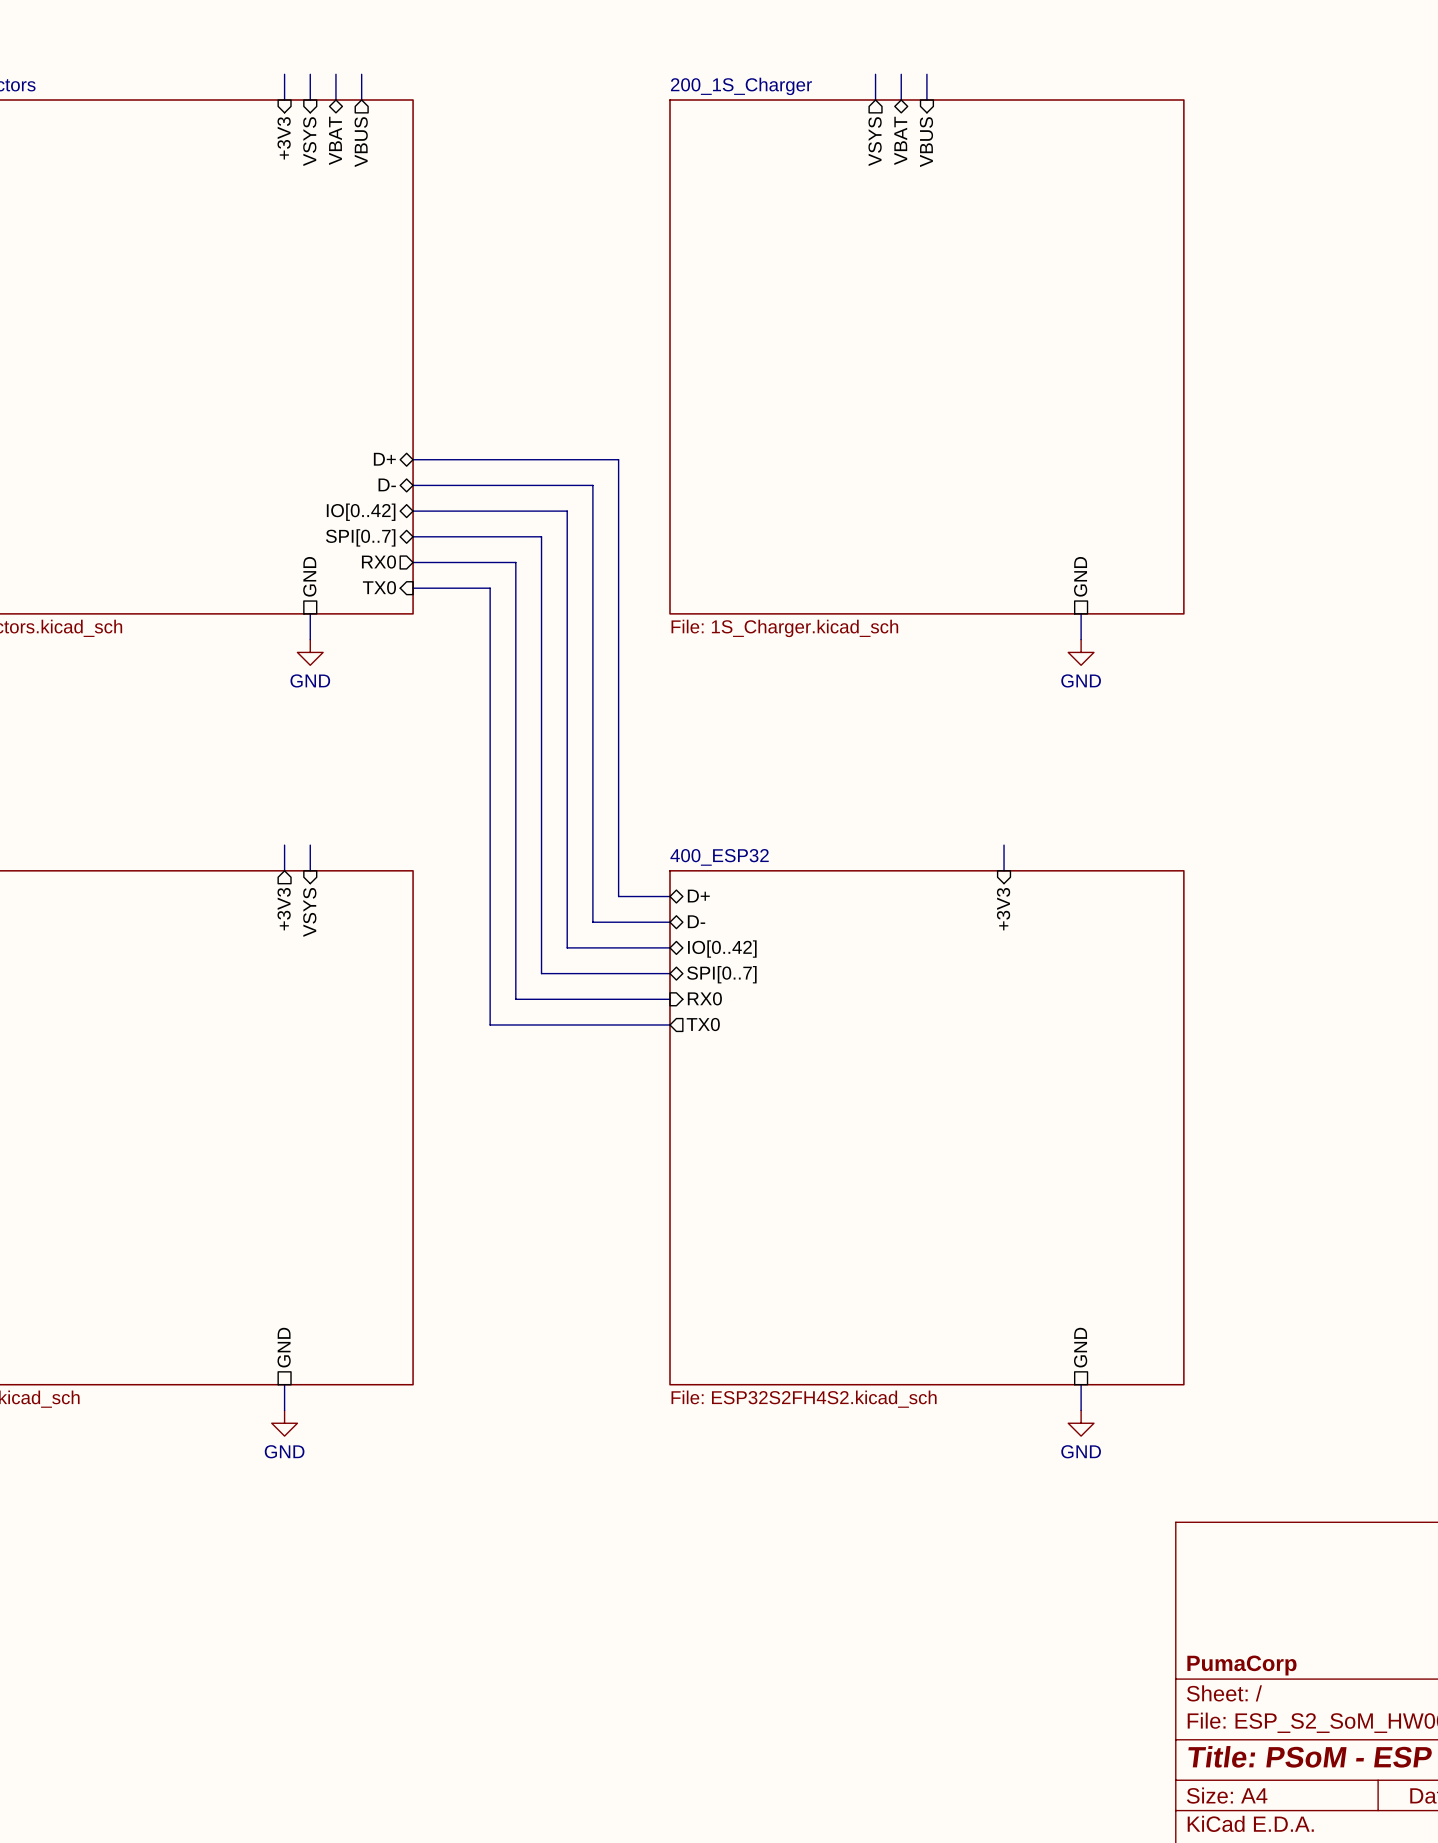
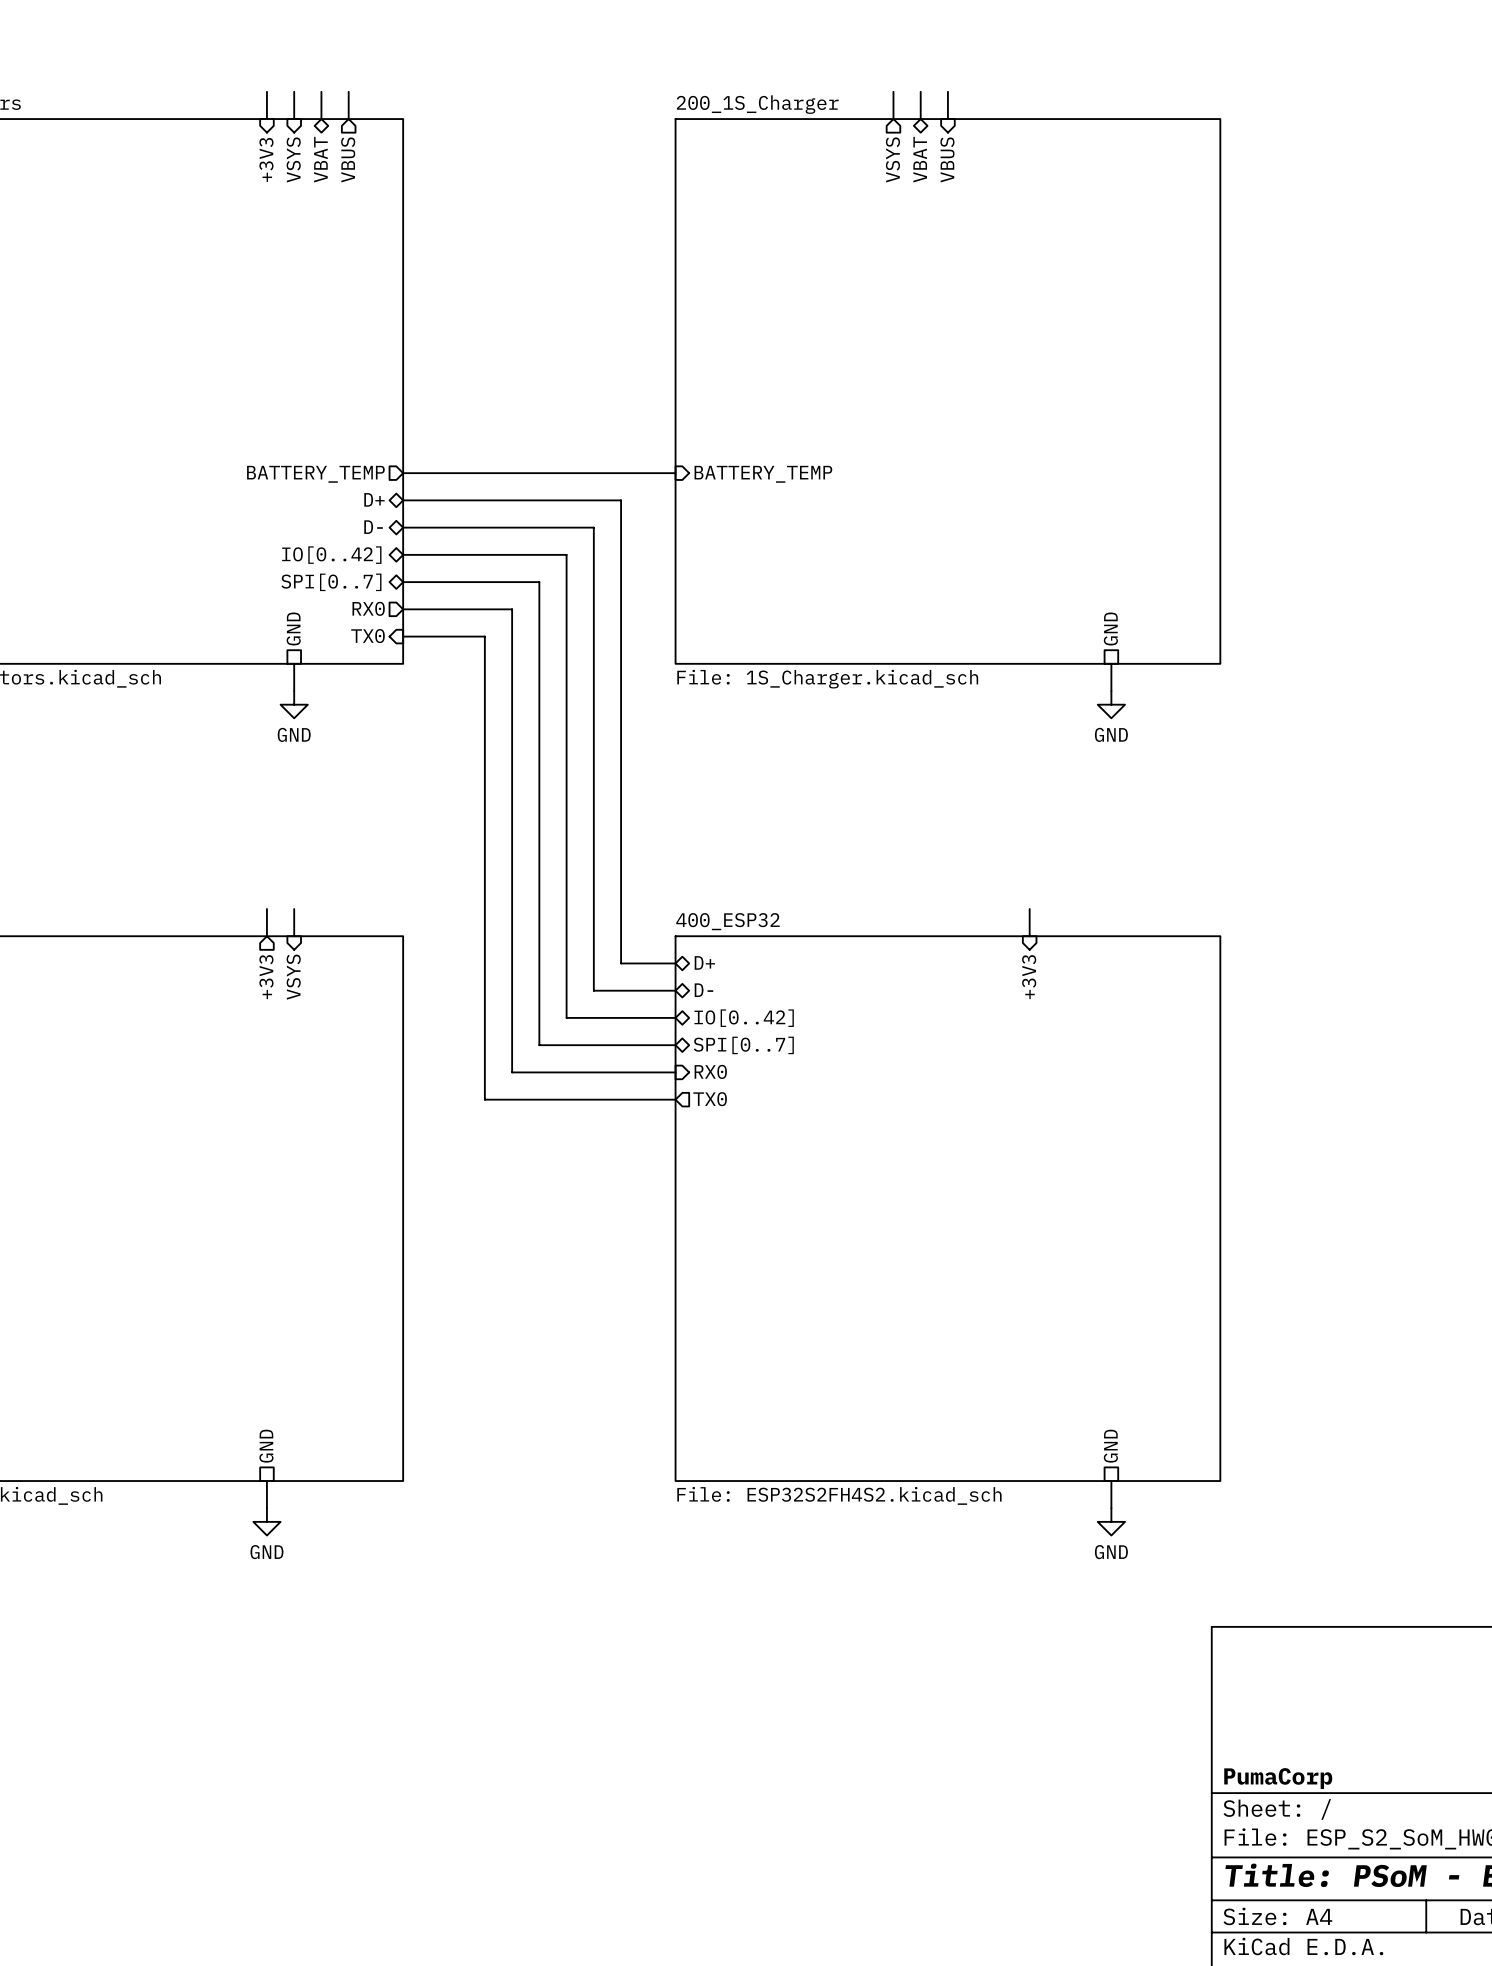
wire: none -> (403, 473) (675, 473)
sheet pin: none -> BATTERY_TEMP (315, 474)
sheet pin: none -> BATTERY_TEMP (763, 474)

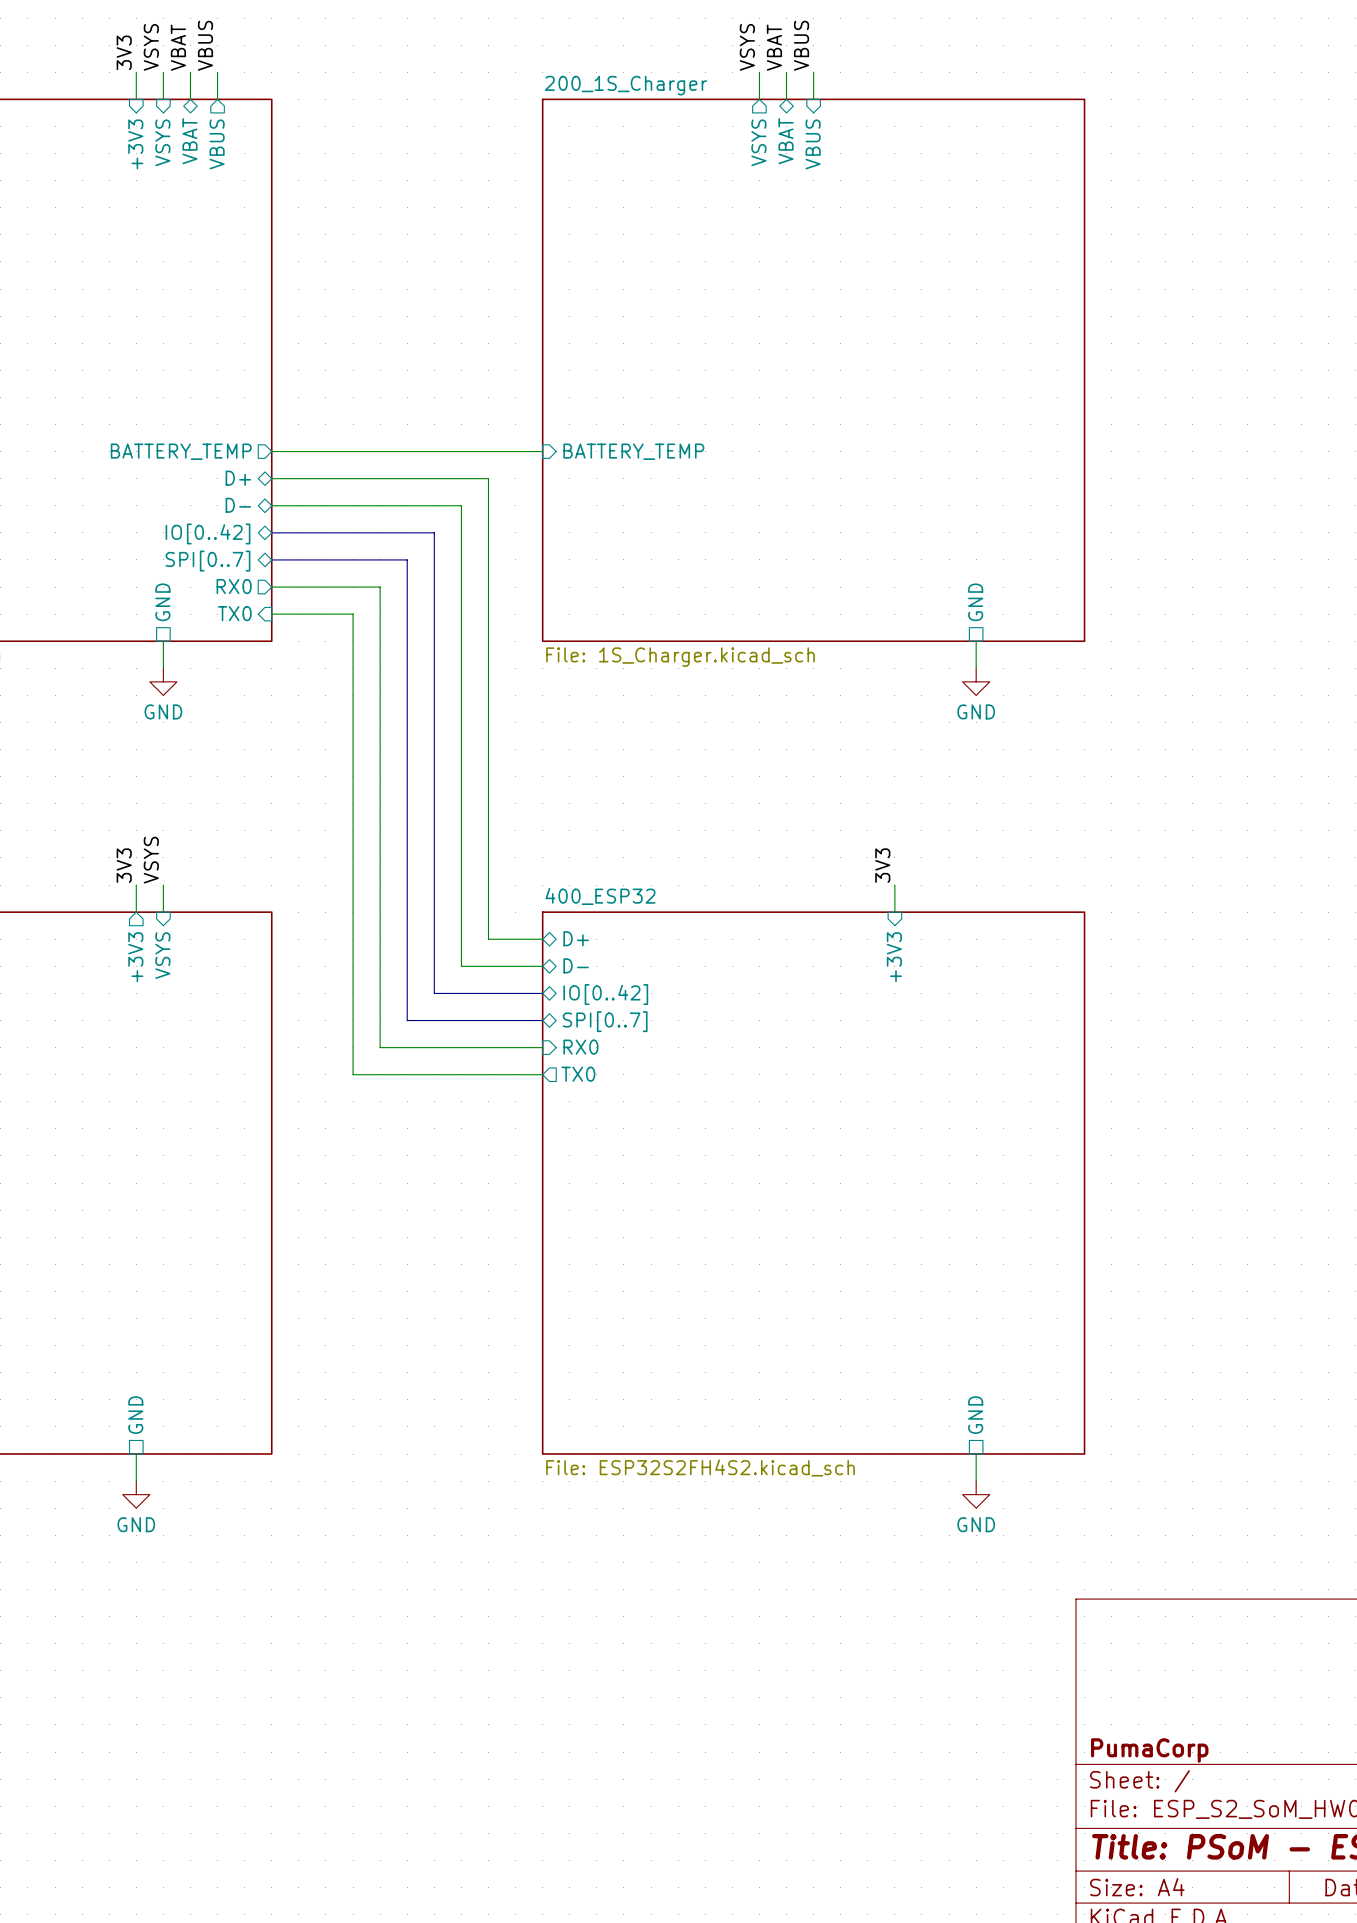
label: none -> VSYS (151, 47)
label: none -> VBAT (178, 47)
label: none -> VBUS (205, 45)
label: none -> VSYS (747, 47)
label: none -> VBAT (774, 47)
label: none -> VBUS (801, 45)
label: none -> 3V3 (124, 52)
label: none -> VSYS (151, 860)
label: none -> 3V3 (124, 865)
label: none -> 3V3 (882, 865)

